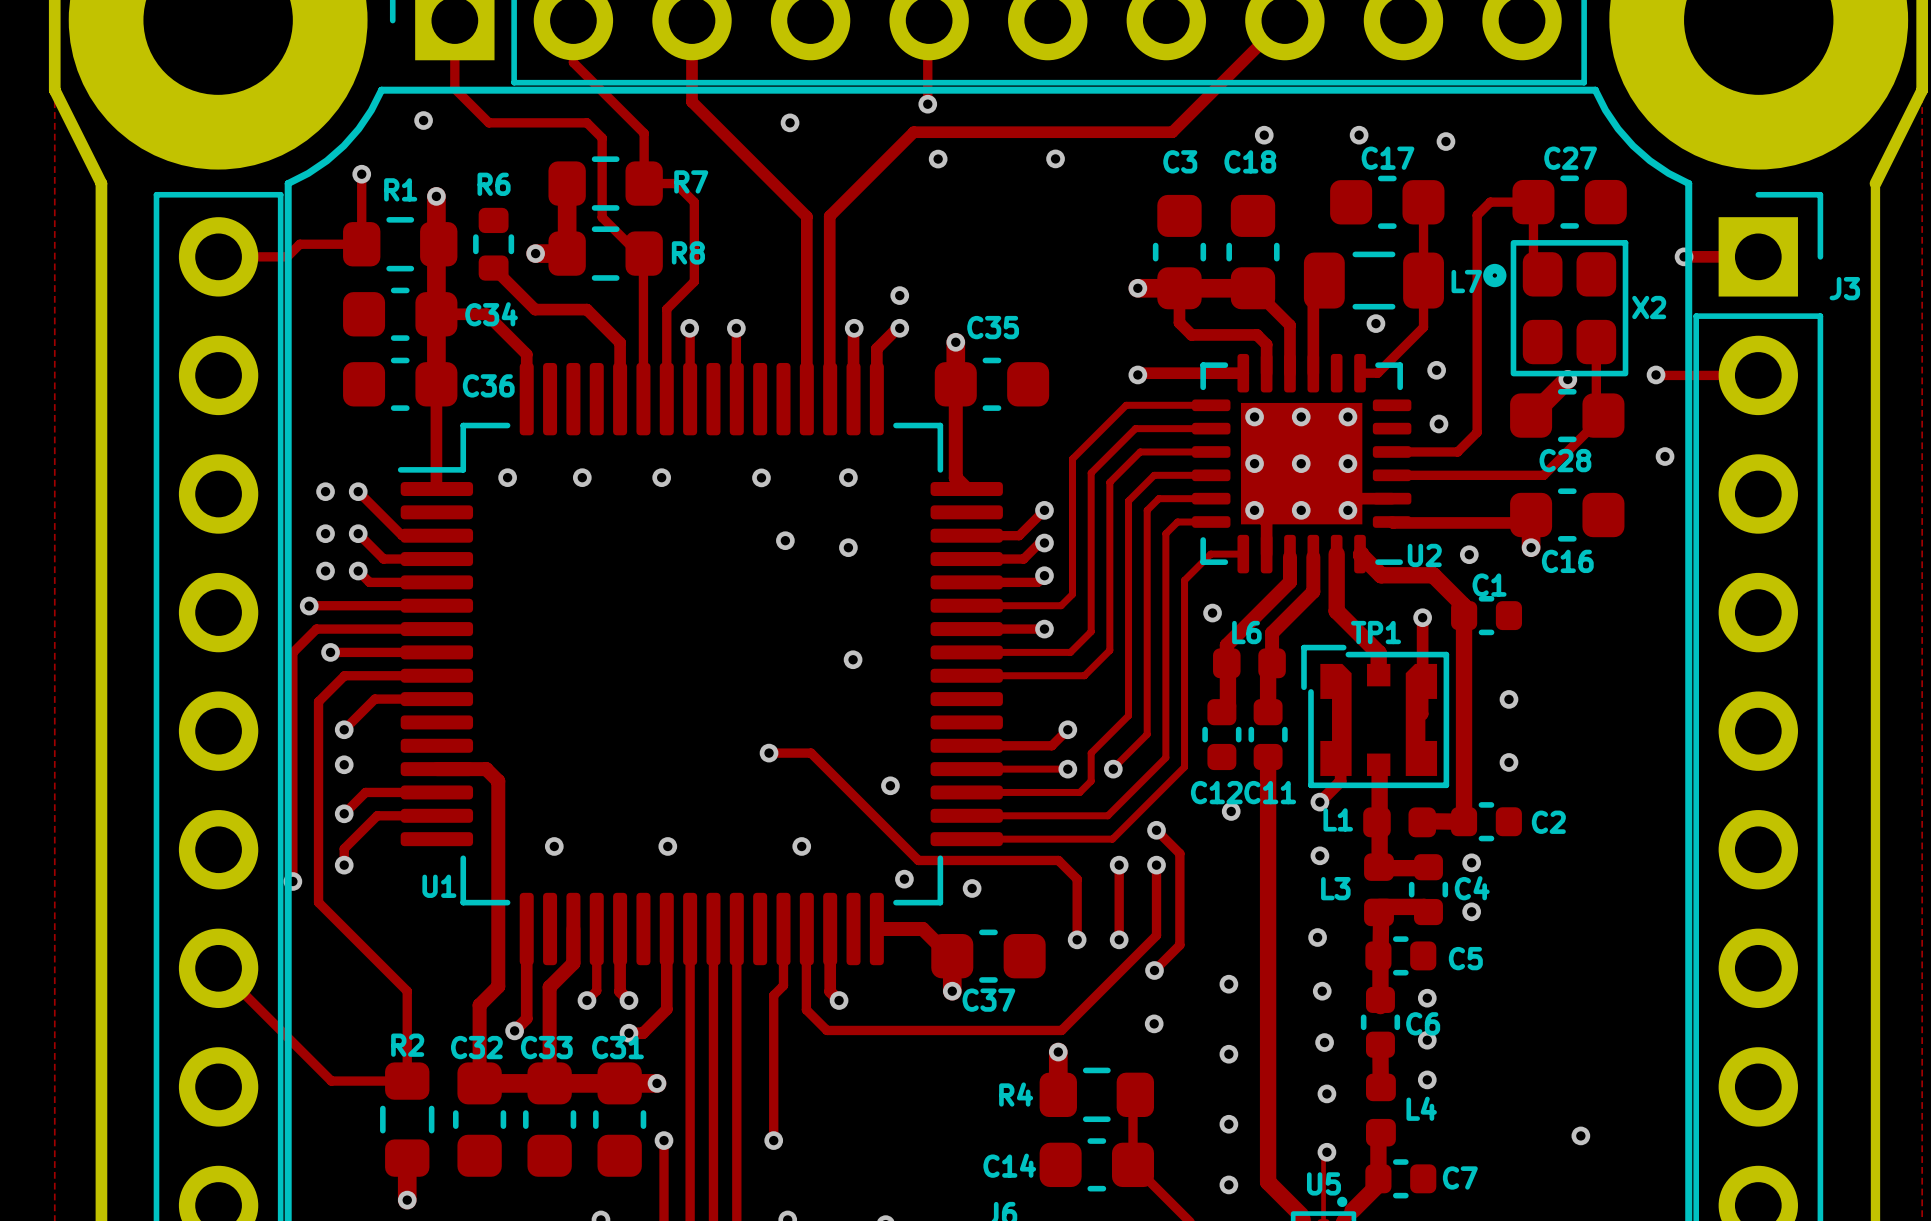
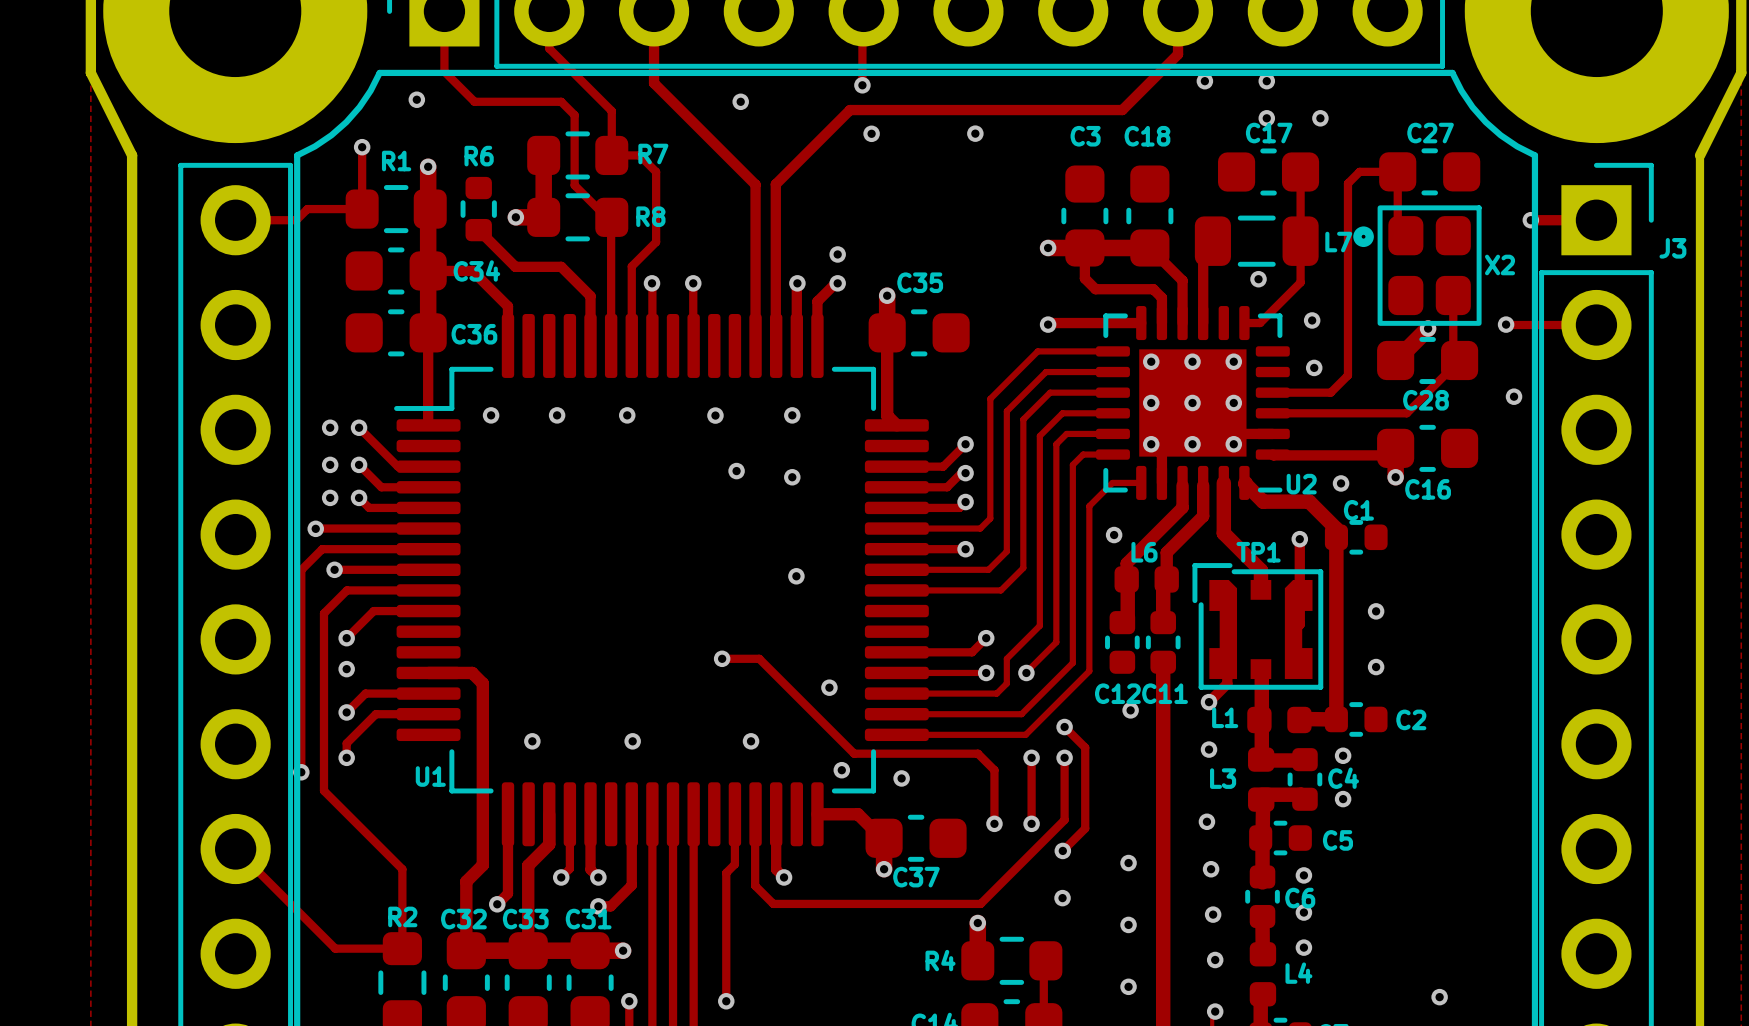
track: (1284, 20) (1172, 132) -> (1178, 11) (1178, 54) (1122, 110) (1078, 110)
via: none -> (1204, 81)
via: none -> (1266, 81)
via: (1264, 135) -> none
via: (1359, 135) -> none
via: none -> (1266, 118)

